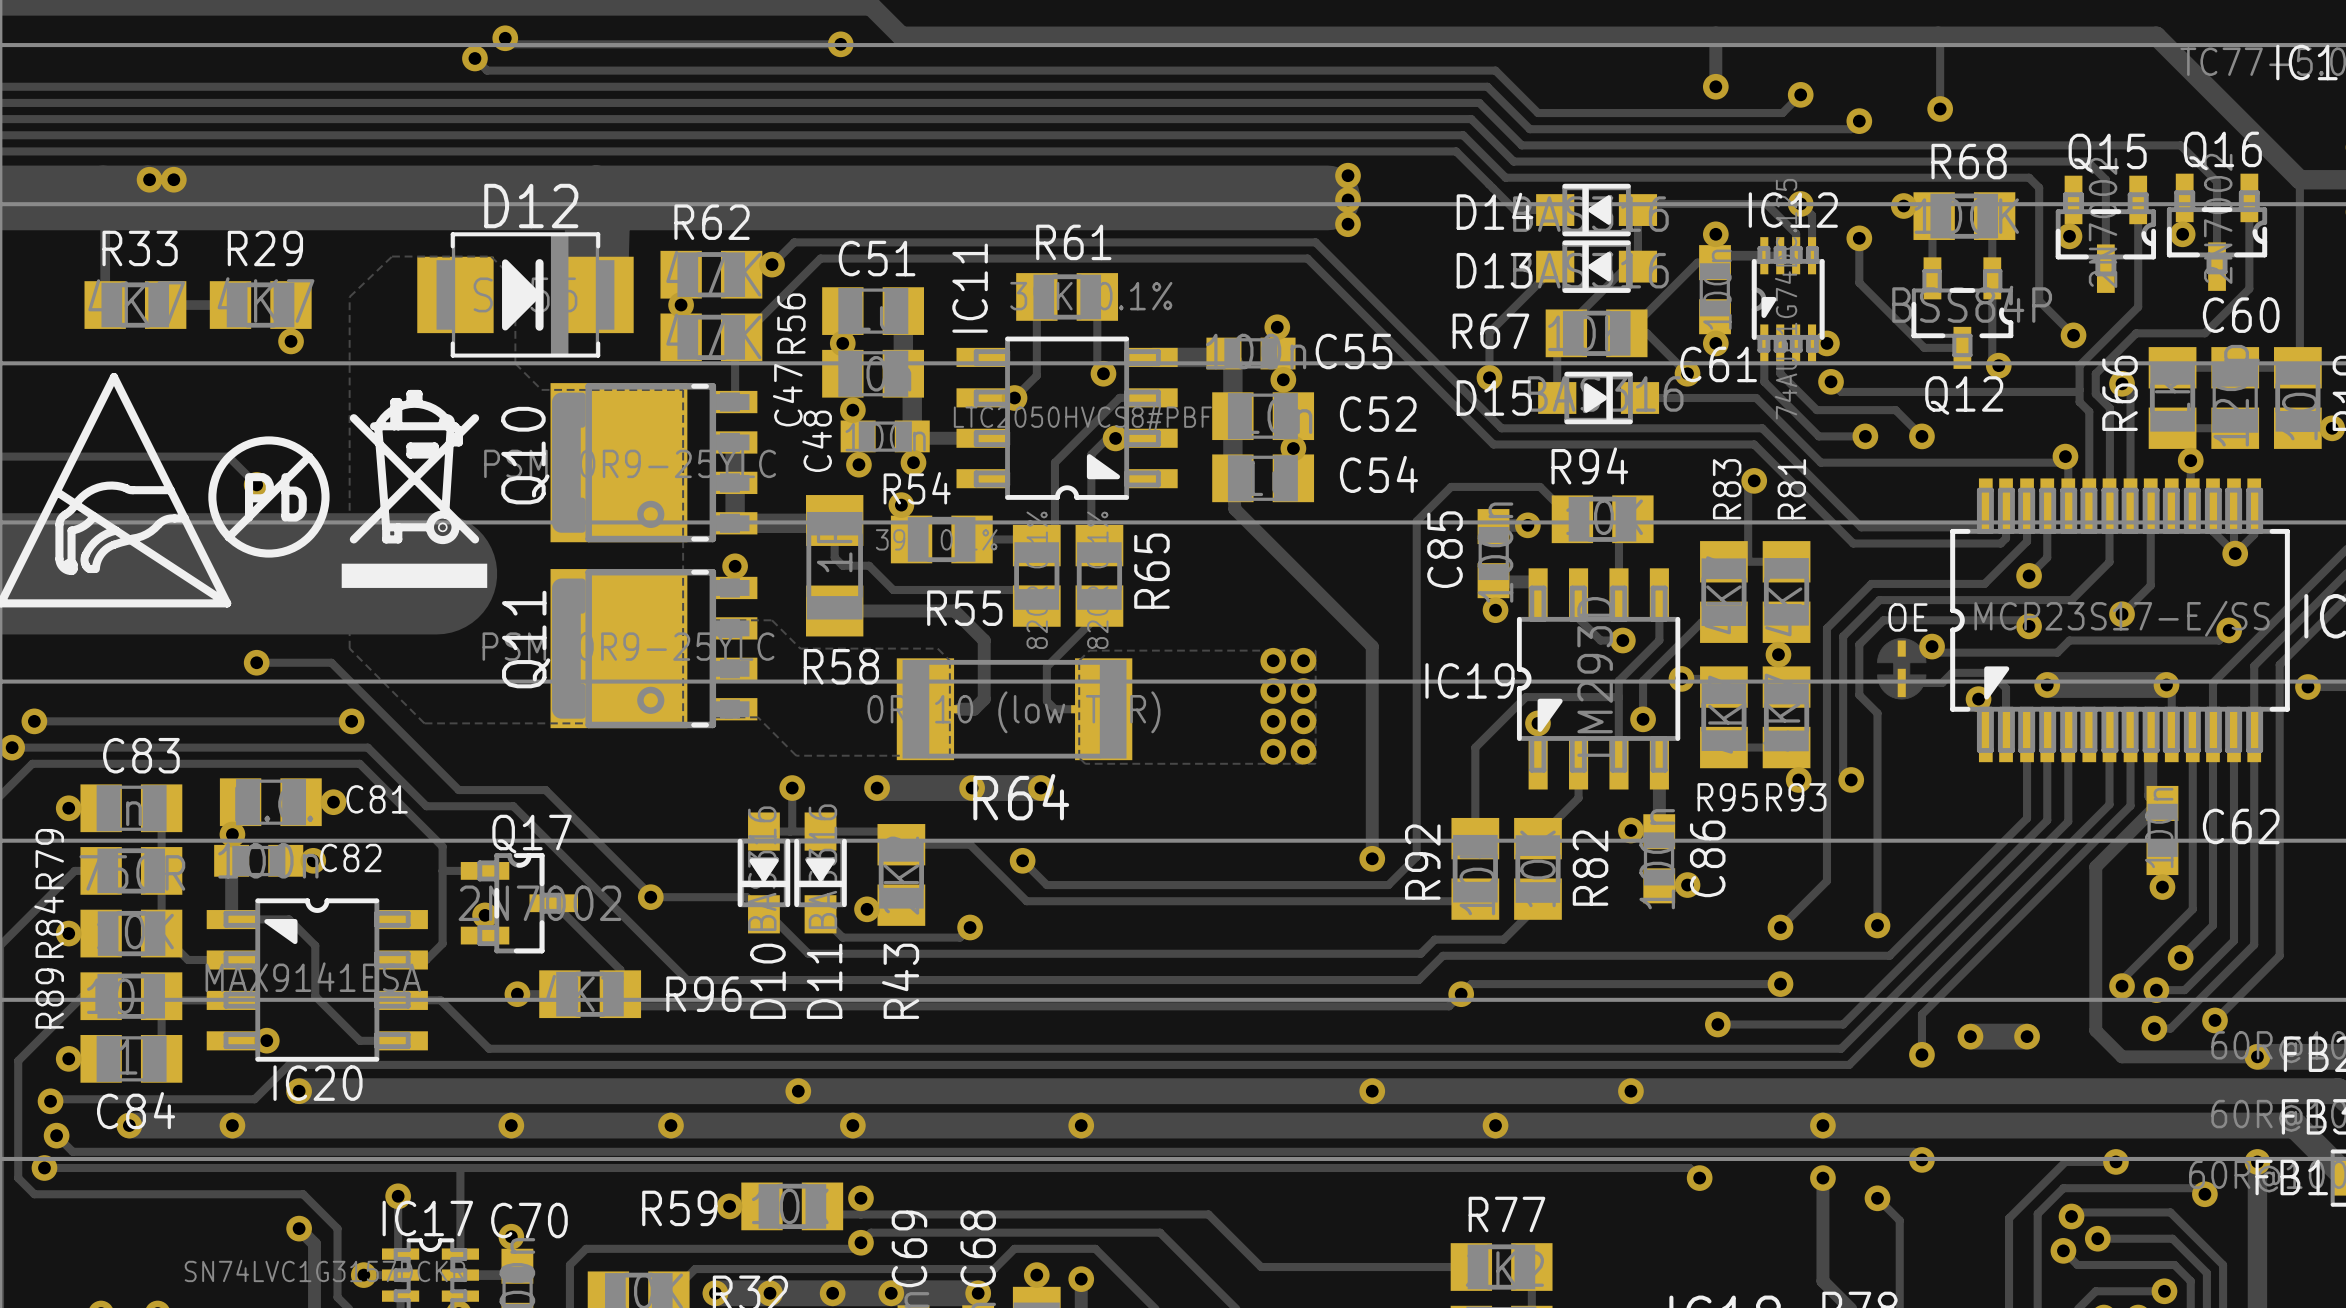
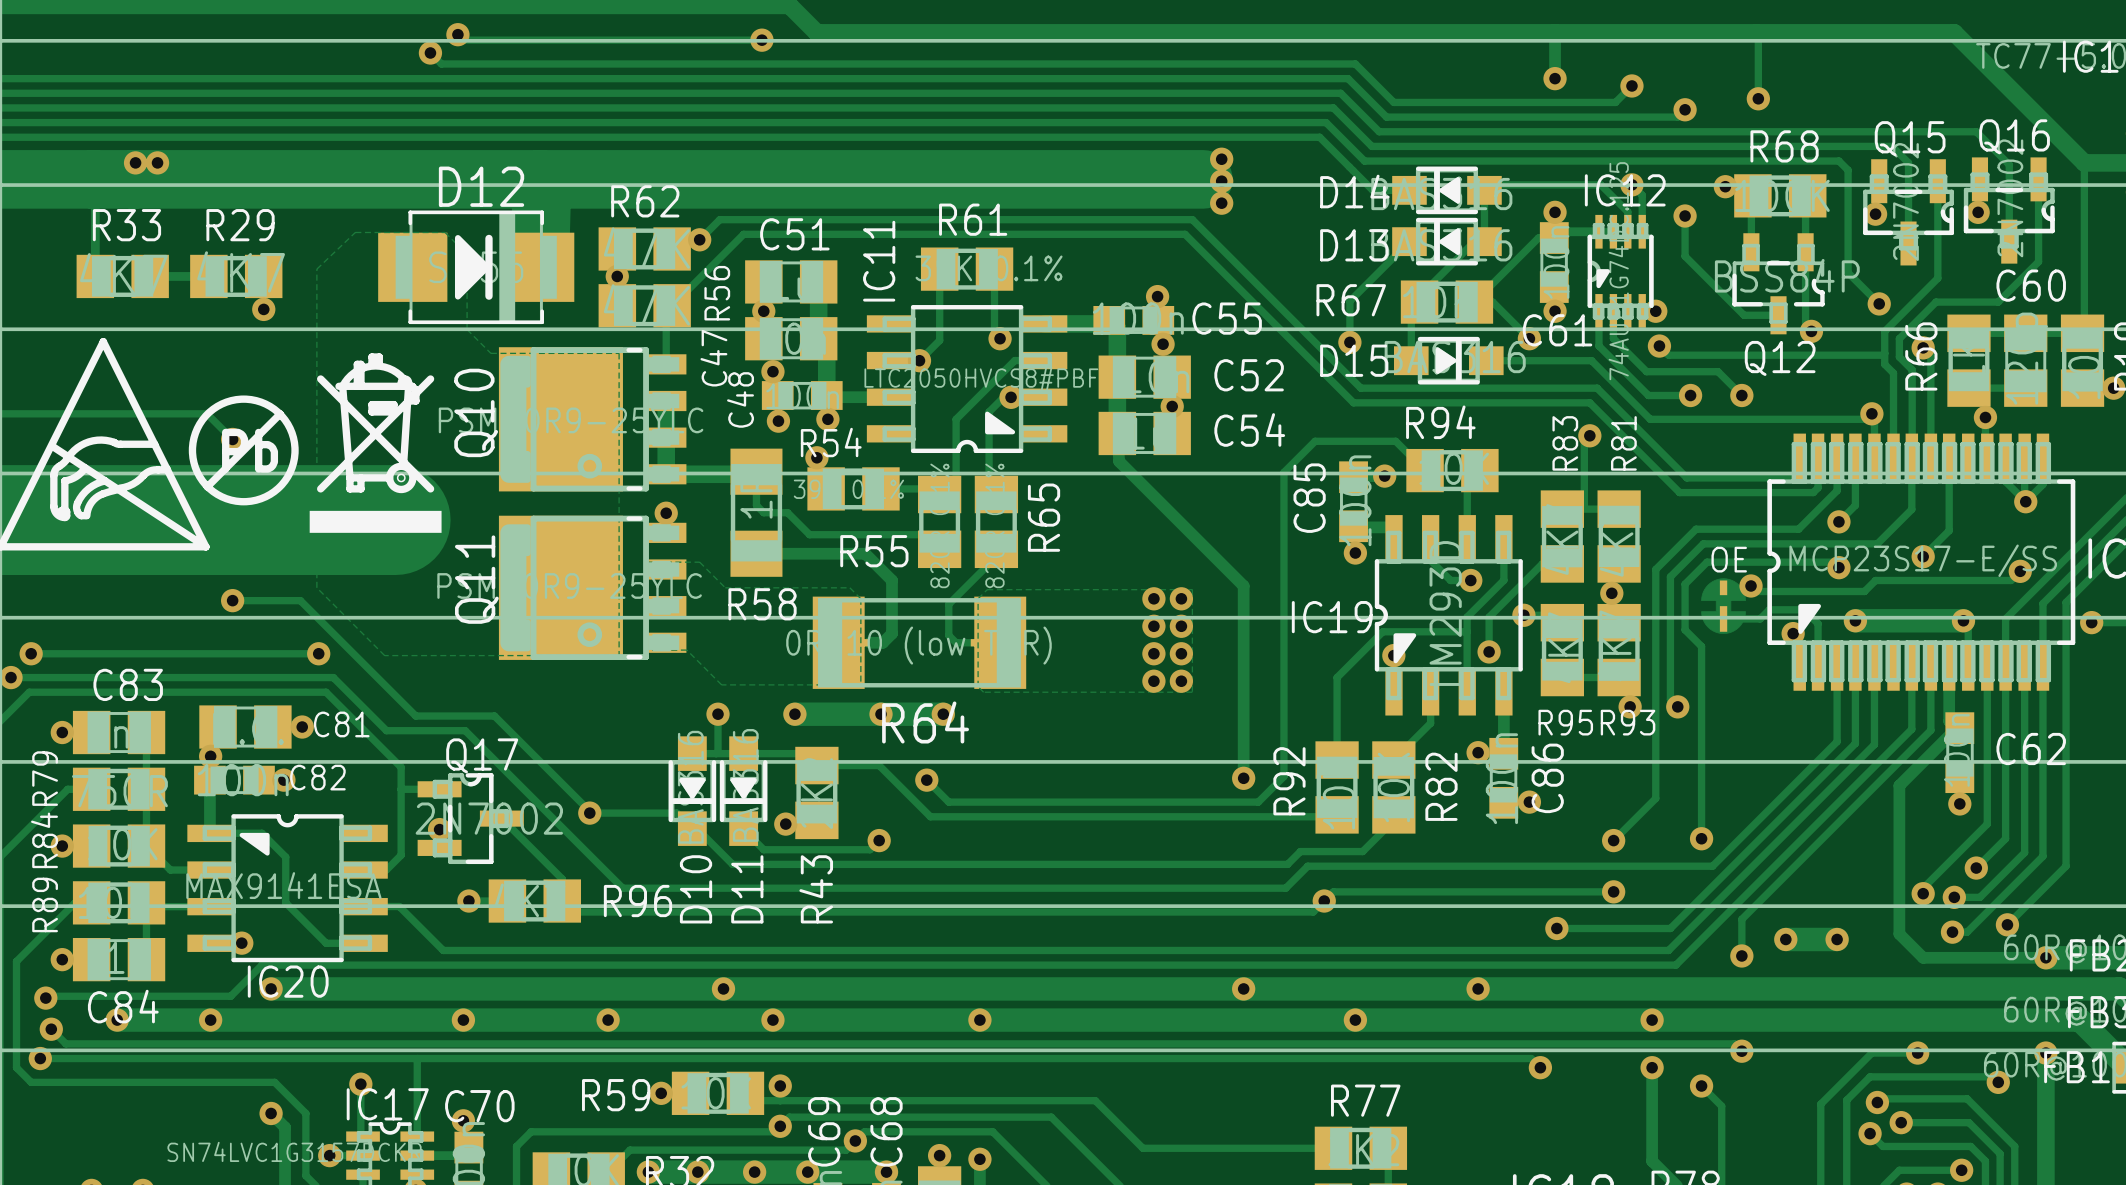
track: (1014, 1248) (994, 1269) (933, 1269) -> (919, 1131) (864, 1131) (846, 1150)
via: none -> (855, 1140)

